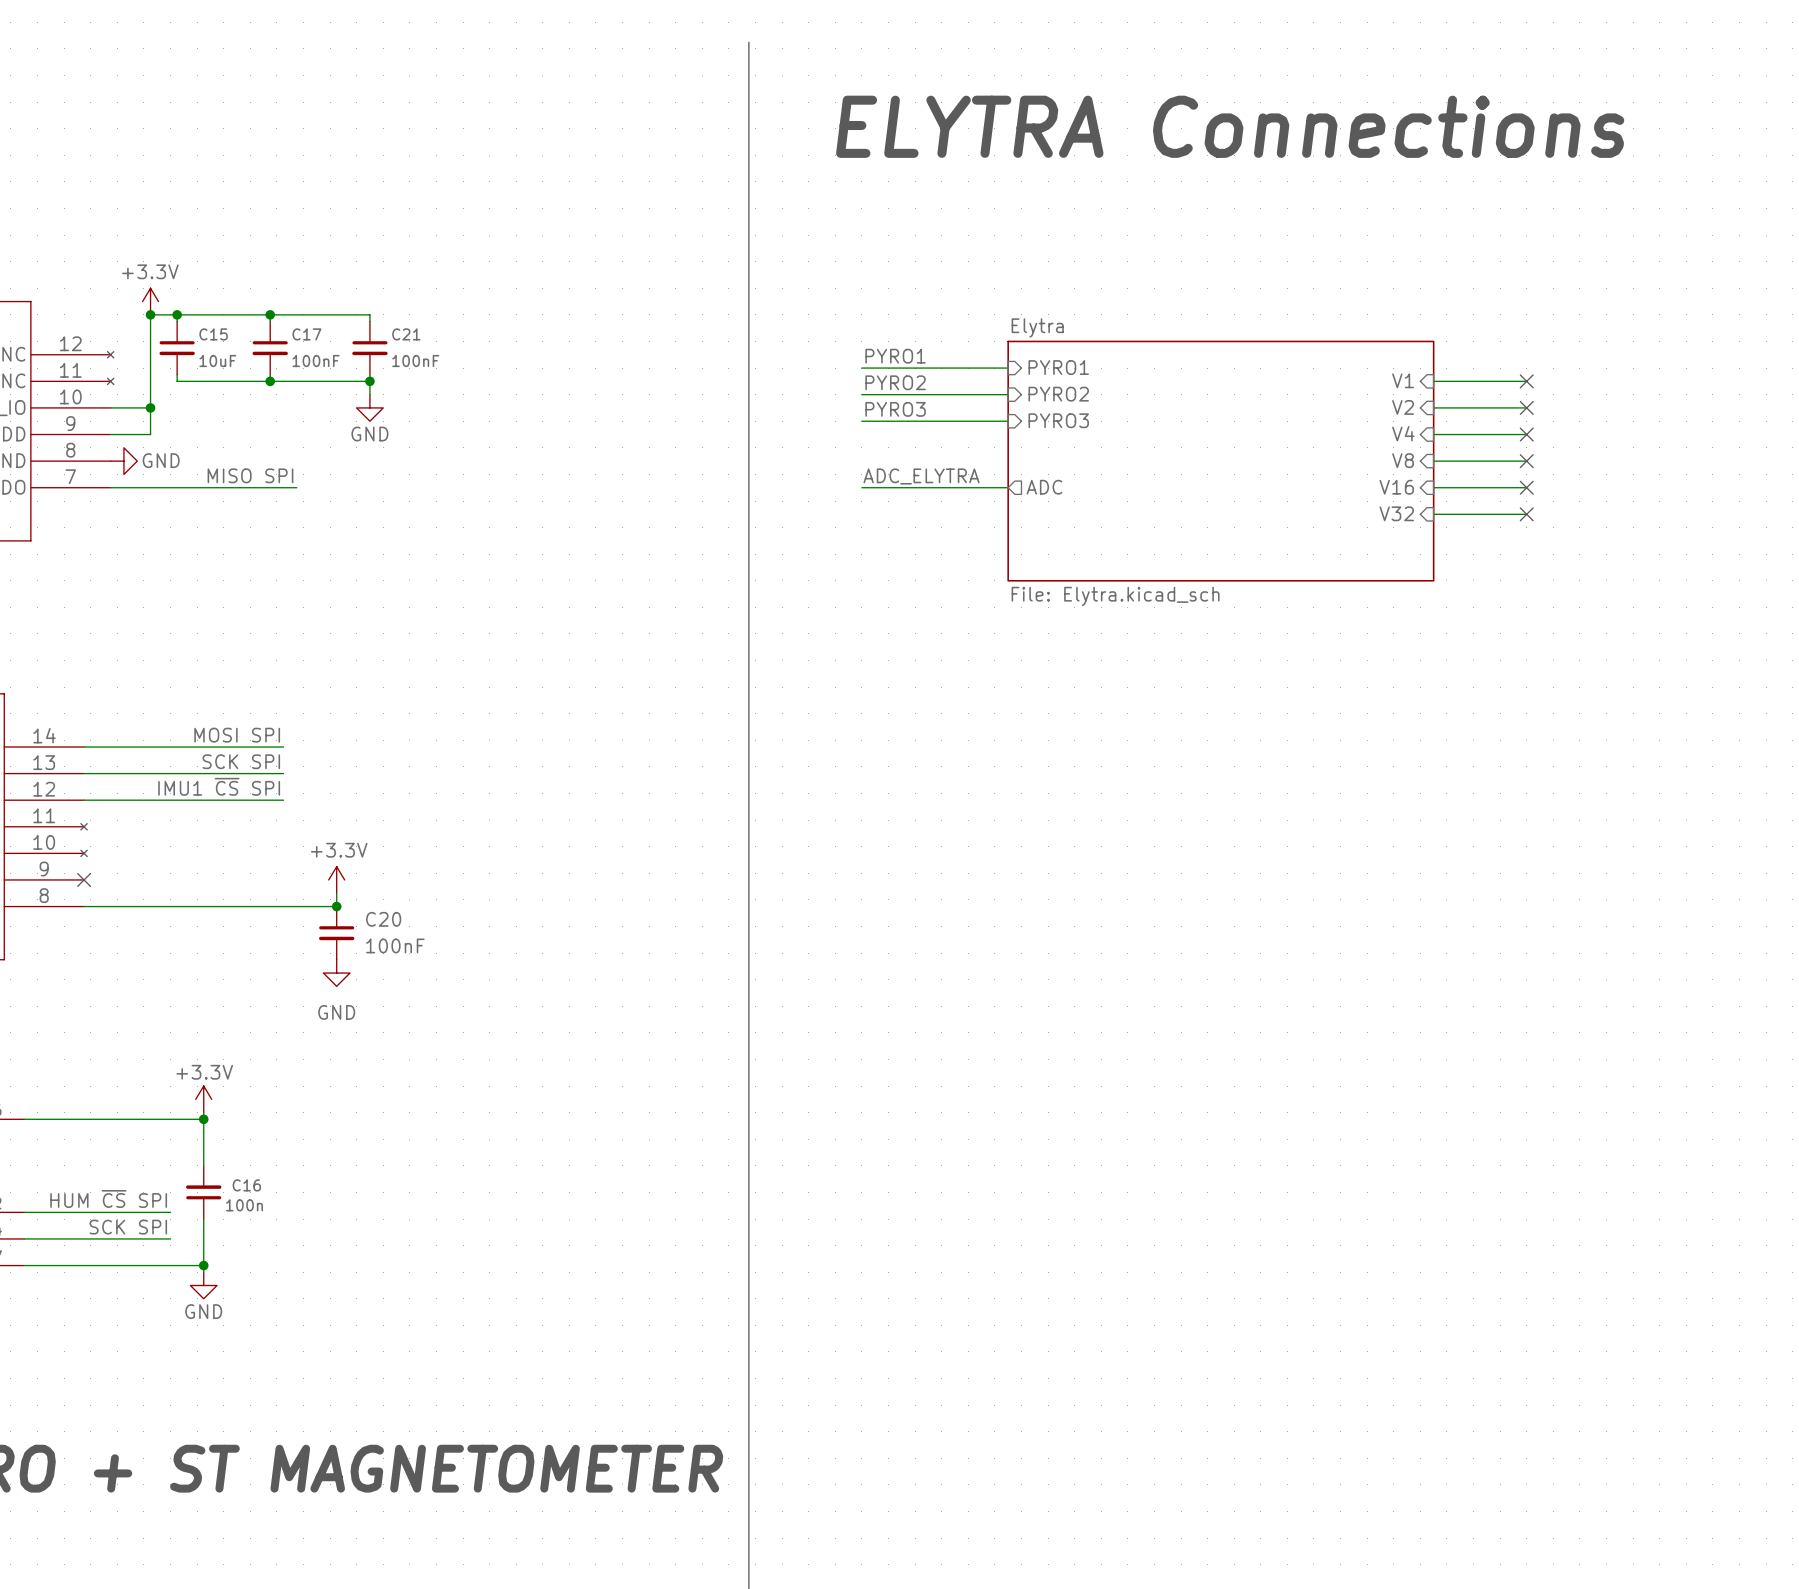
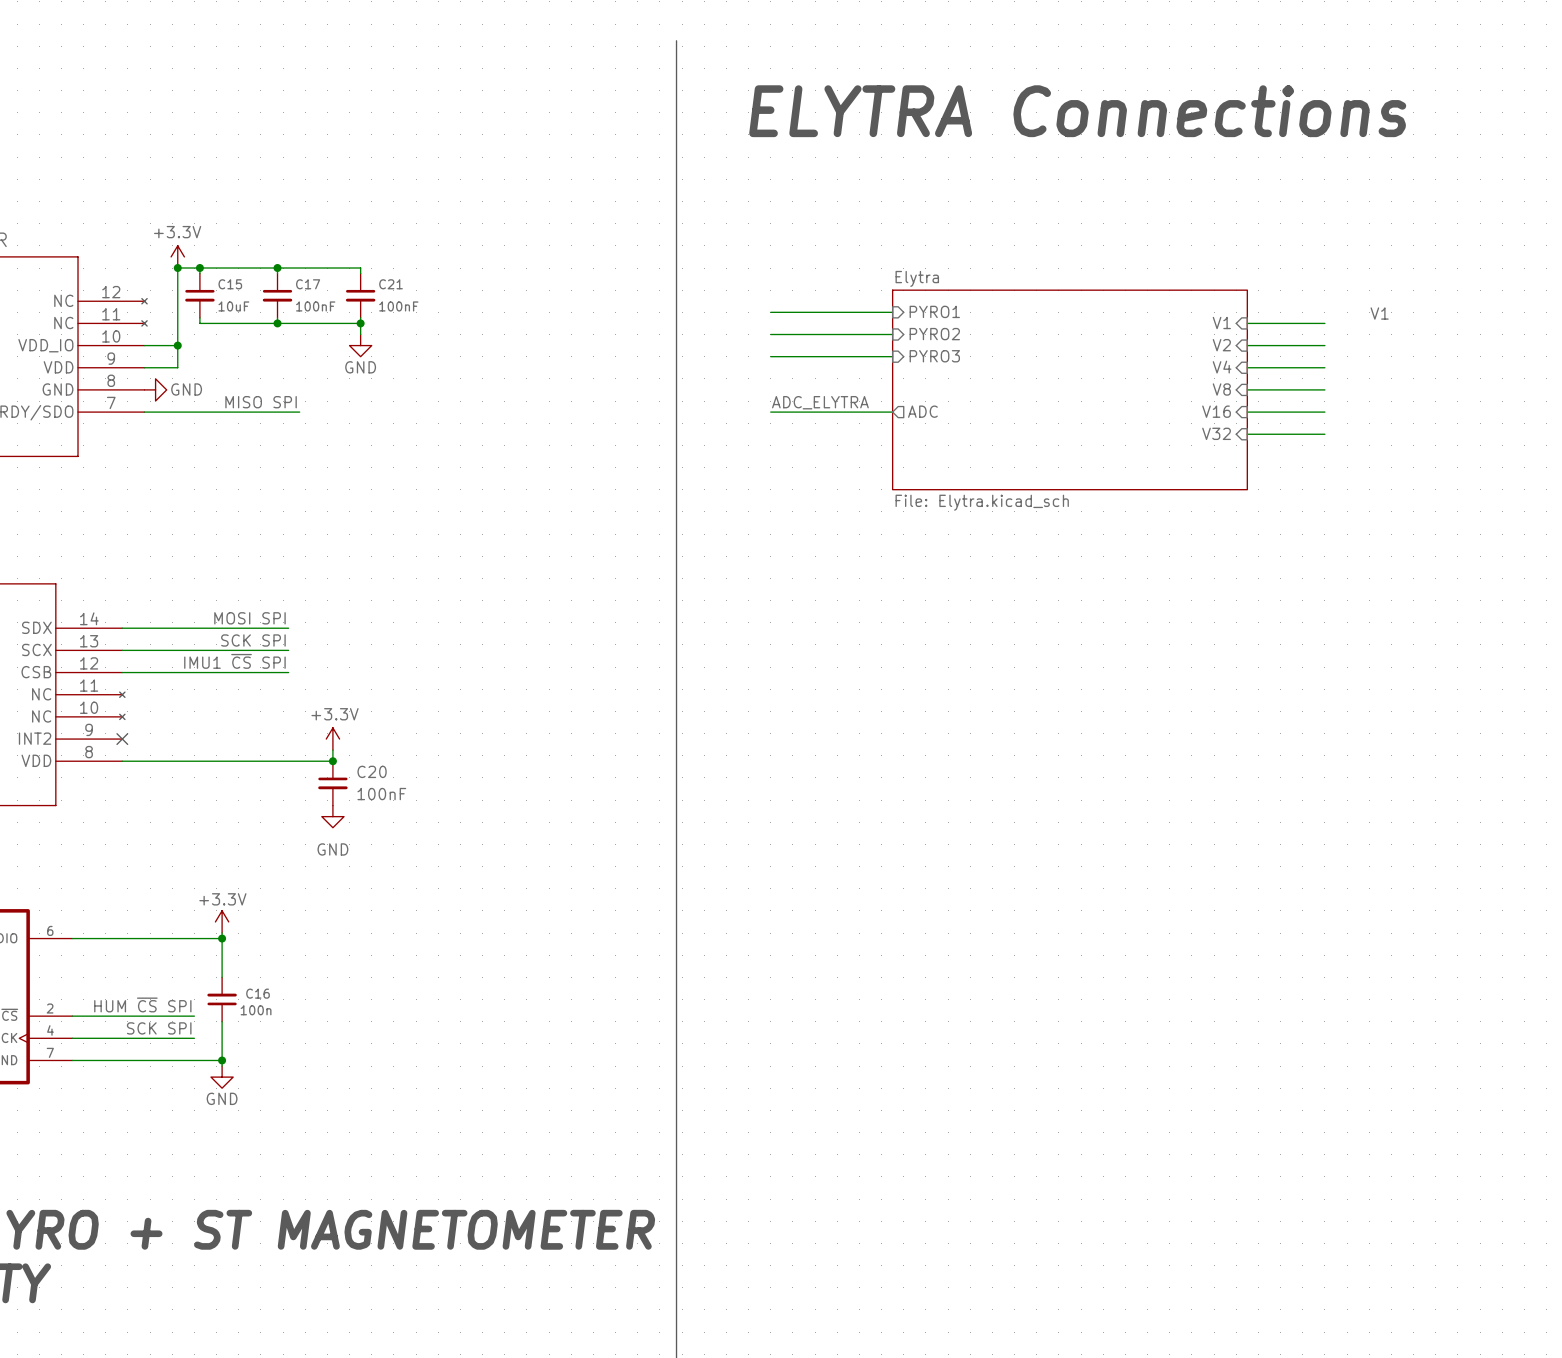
label: PYRO1 (895, 356) -> none
label: none -> V1 (1379, 313)
no-connect mark: (1526, 381) -> none
label: PYRO2 (895, 382) -> none
no-connect mark: (1526, 407) -> none
label: PYRO3 (895, 409) -> none
no-connect mark: (1526, 434) -> none
no-connect mark: (1526, 461) -> none
no-connect mark: (1526, 487) -> none
no-connect mark: (1526, 514) -> none

